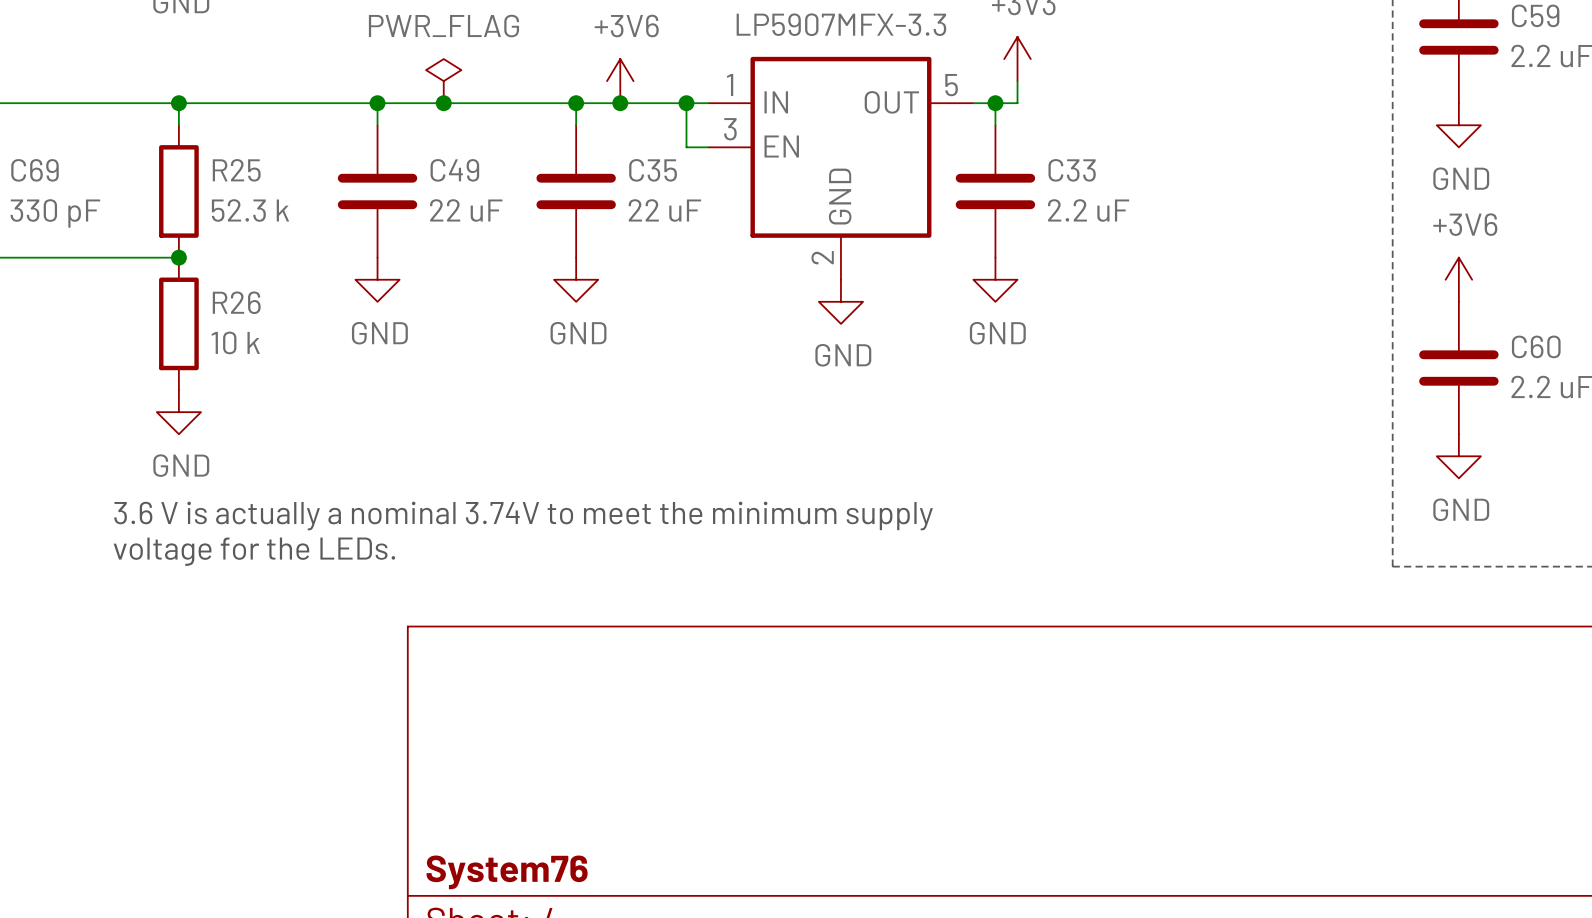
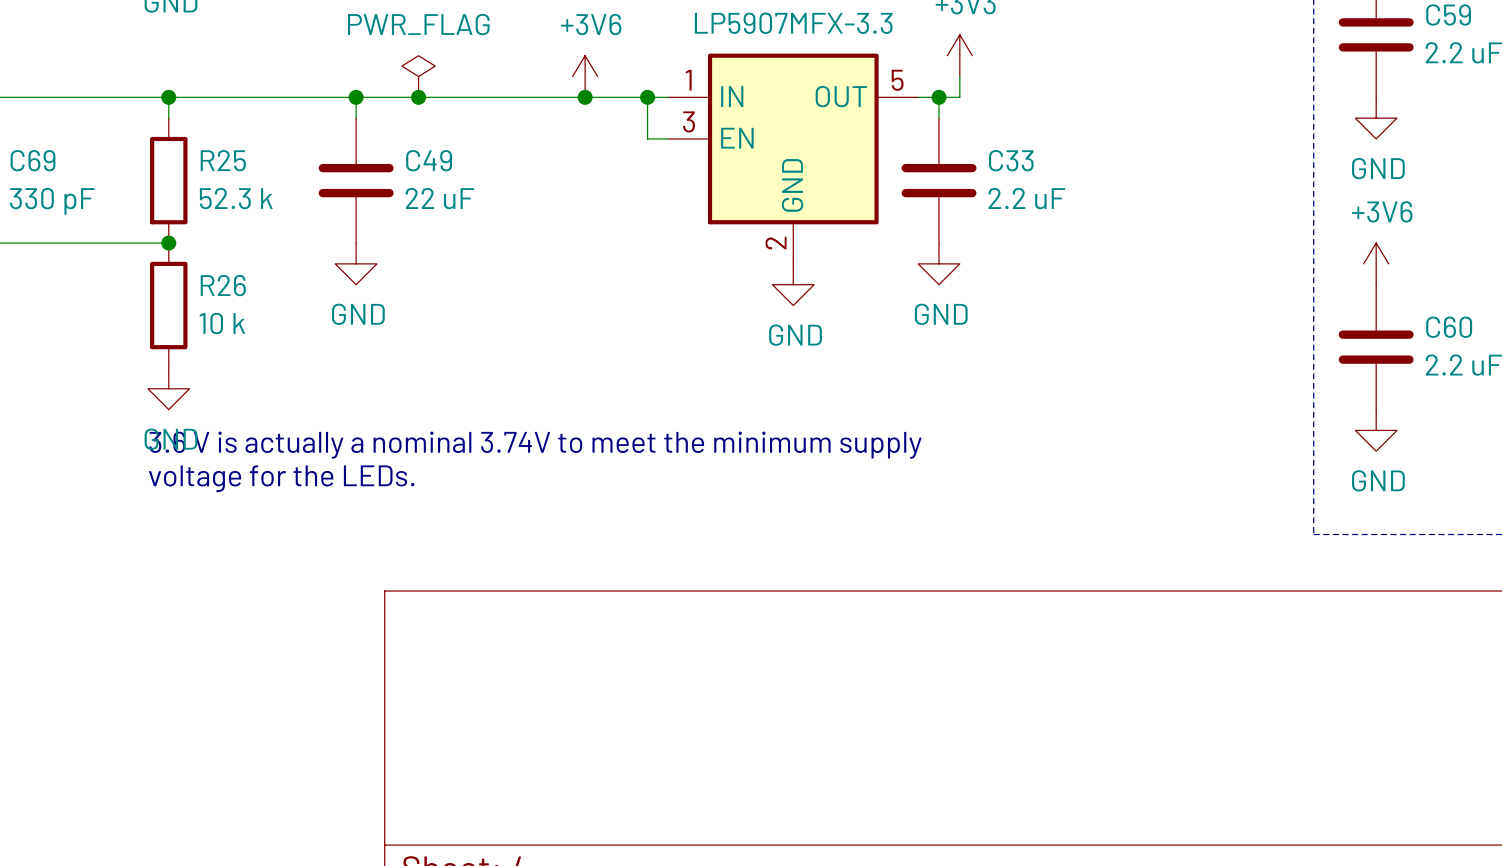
wire: (576, 103) (576, 125) -> none
junction: (576, 103) -> none
C35: 22 uF (576, 191) -> none
power symbol: GND (576, 279) -> none
text position: 3.6 V is actually a nominal 3.74V to meet the minimum supply (523, 516) -> 3.6 V is actually a nominal 3.74V to meet the minimum supply (535, 445)
text position: voltage for the LEDs. (254, 551) -> voltage for the LEDs. (281, 478)
title block: System76 (507, 872) -> none

